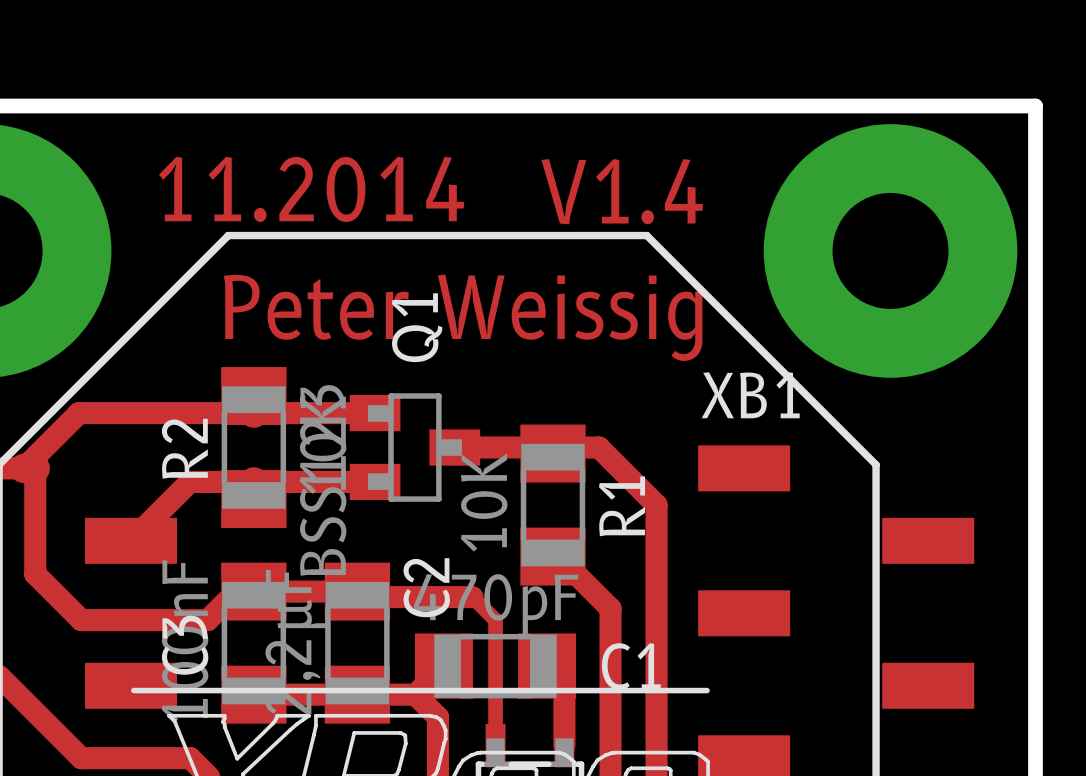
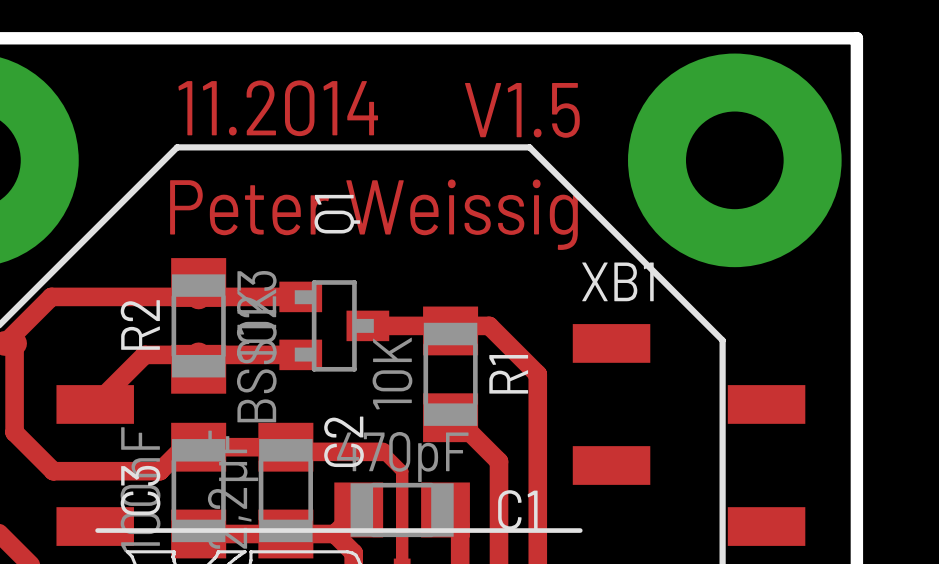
text: V1.4 (622, 191) -> V1.5 (522, 110)

